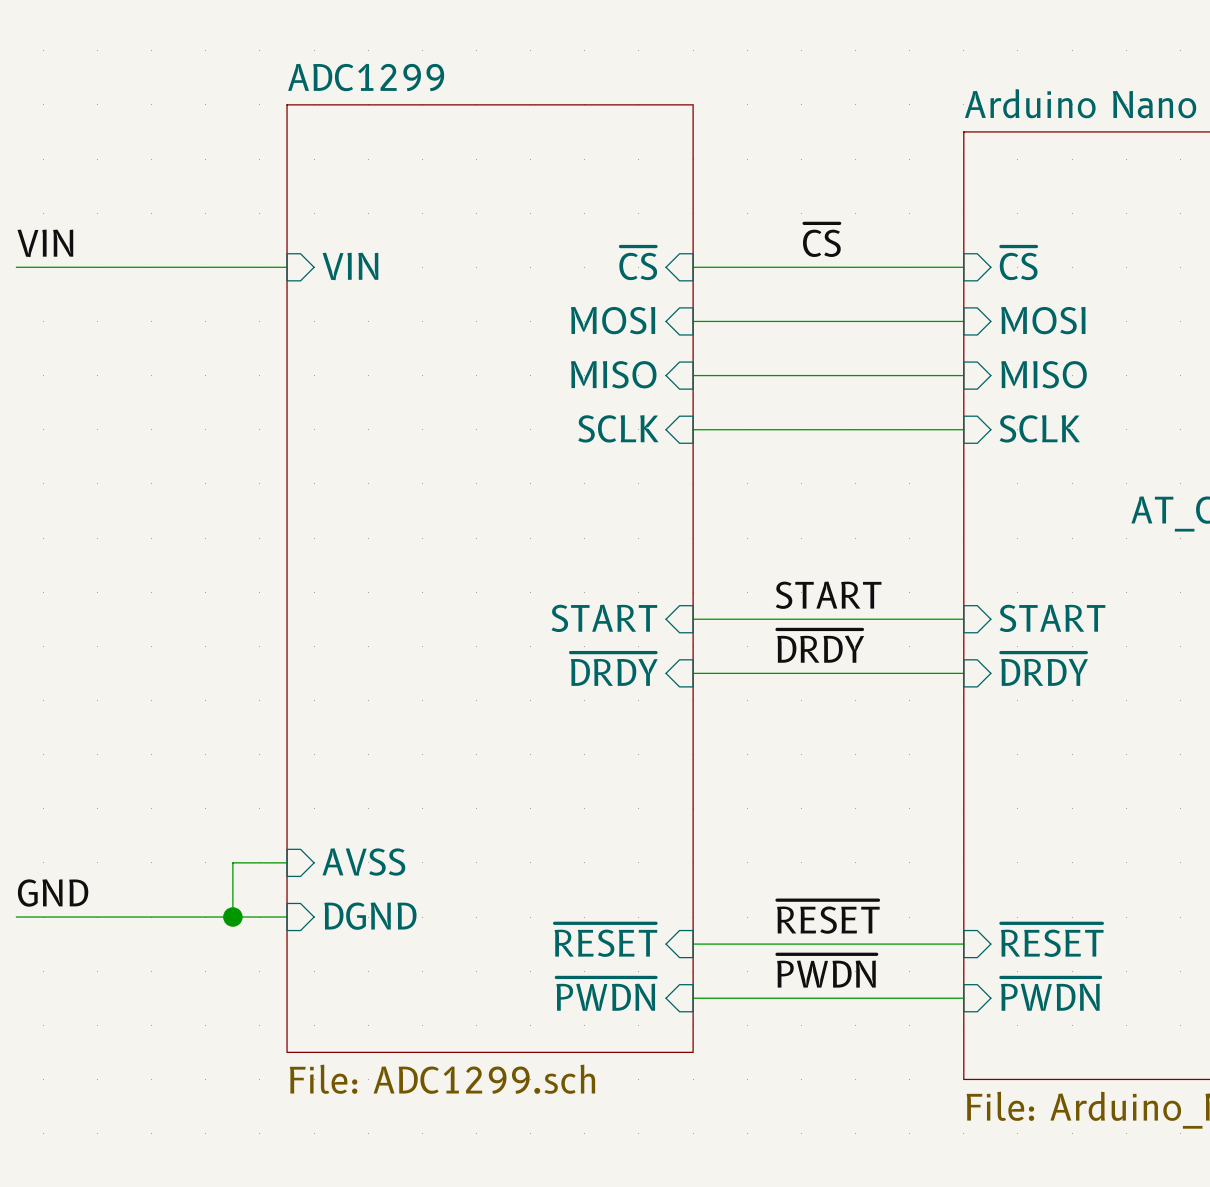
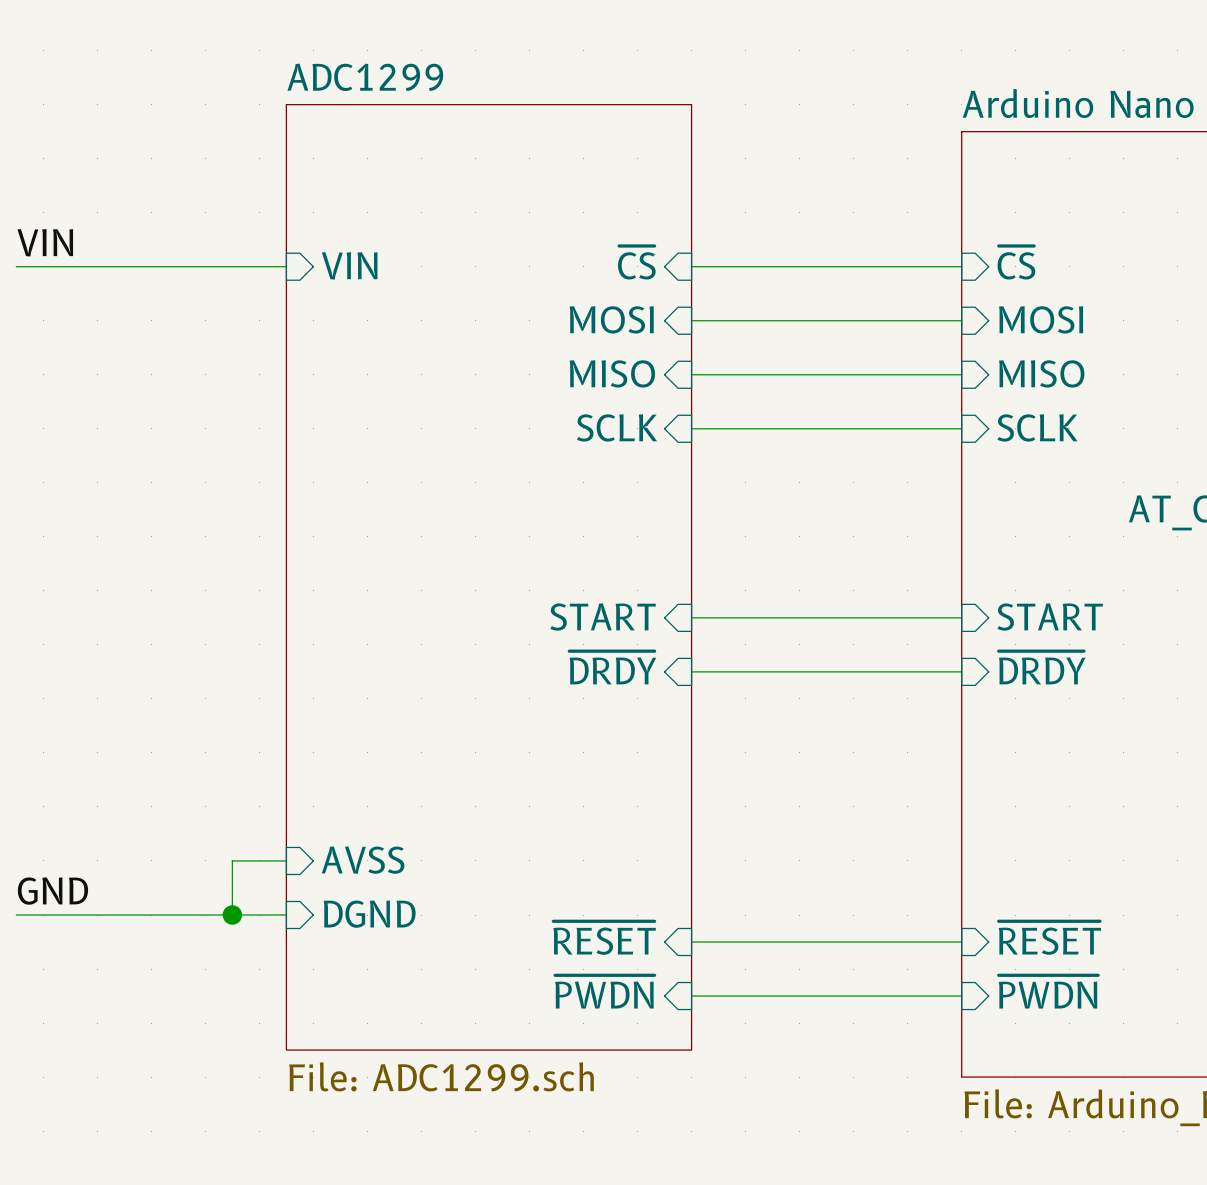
label: ~{CS} (821, 240) -> none
label: START (828, 595) -> none
label: ~{DRDY} (820, 646) -> none
label: ~{RESET} (828, 916) -> none
label: ~{PWDN} (826, 970) -> none

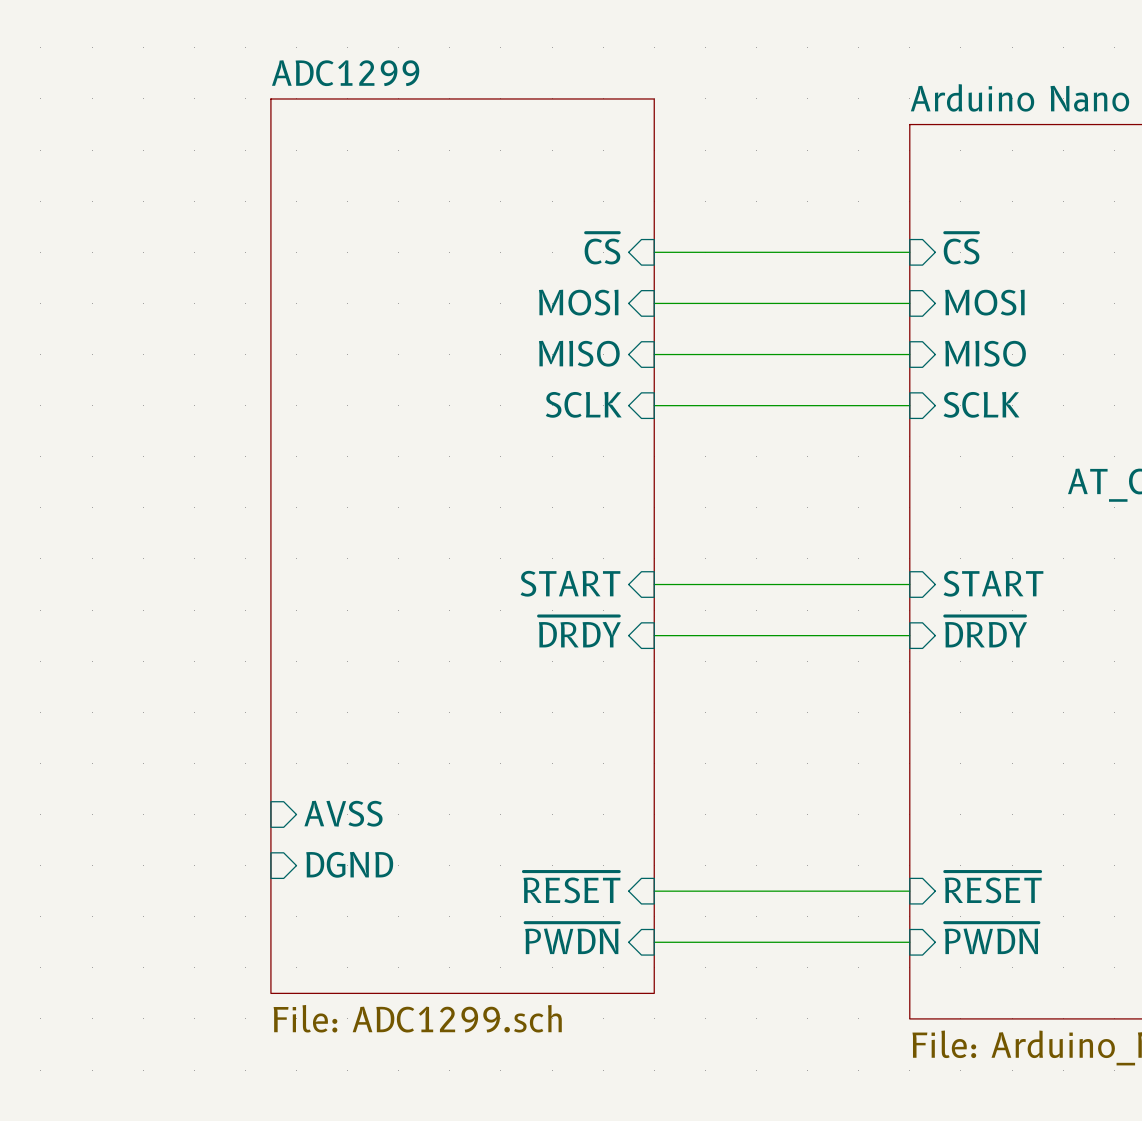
label: VIN (45, 242) -> none
sheet pin: VIN (349, 265) -> none
wire: (16, 266) (286, 266) -> none
wire: (286, 860) (232, 860) (232, 915) -> none
label: GND (52, 891) -> none
wire: (16, 915) (286, 915) -> none
junction: (232, 915) -> none

